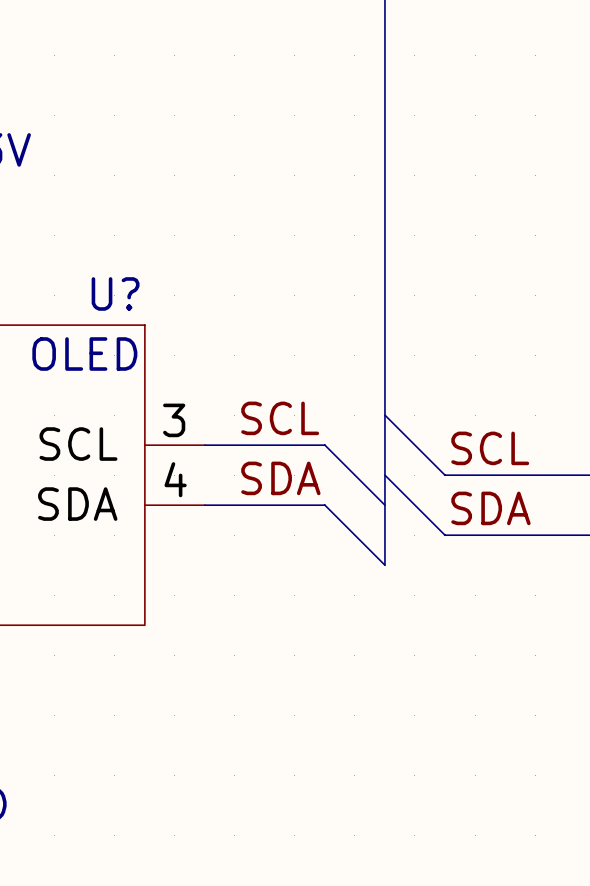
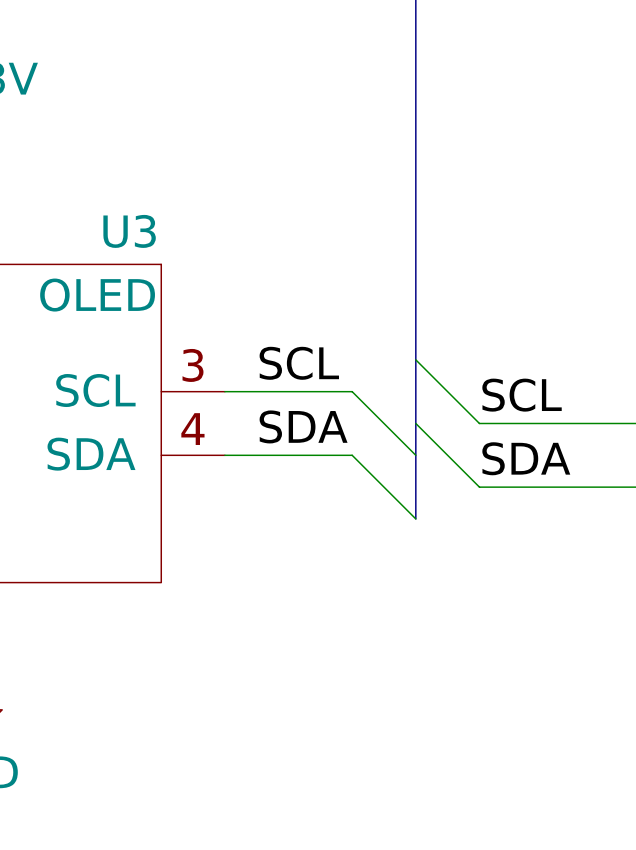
U? name: U? (115, 293) -> U3 (129, 231)

